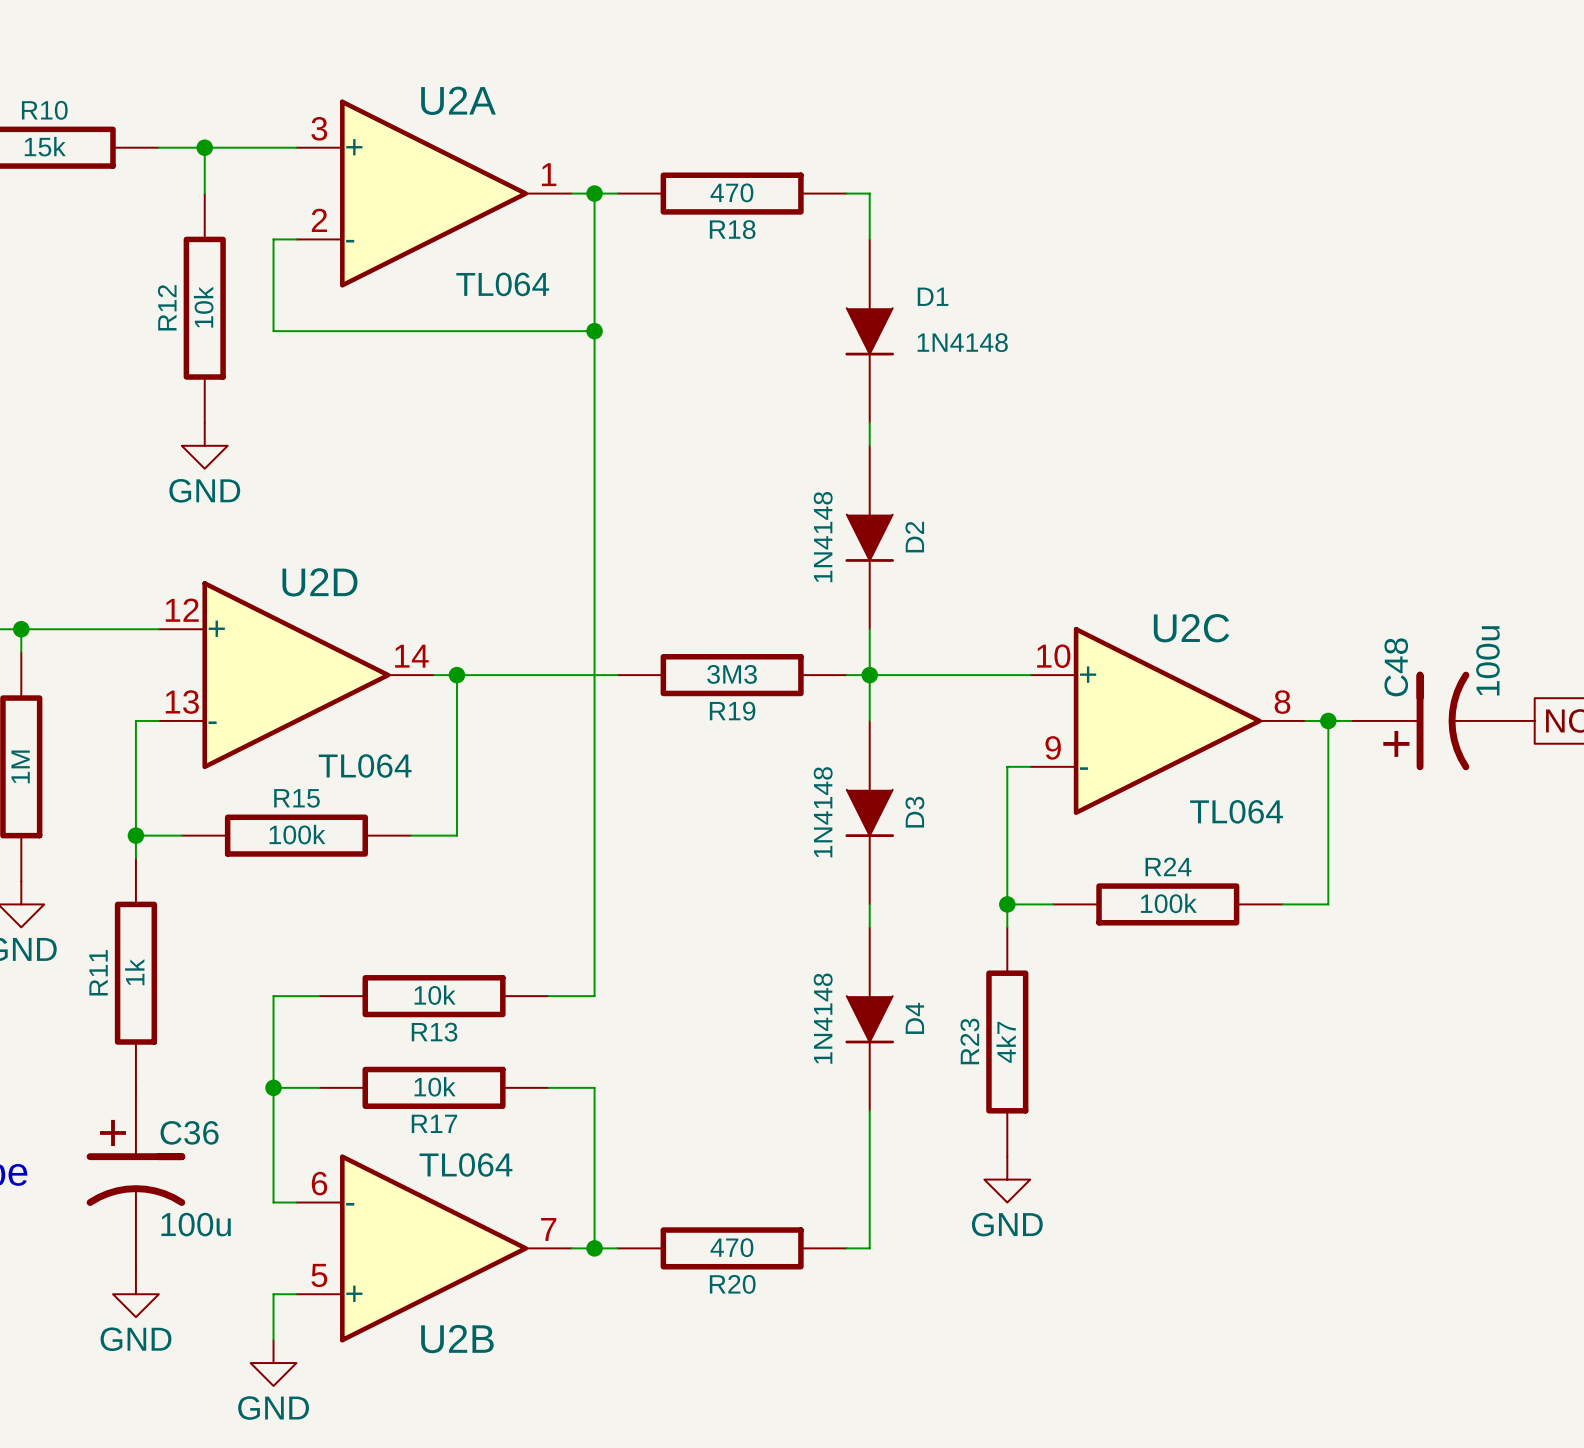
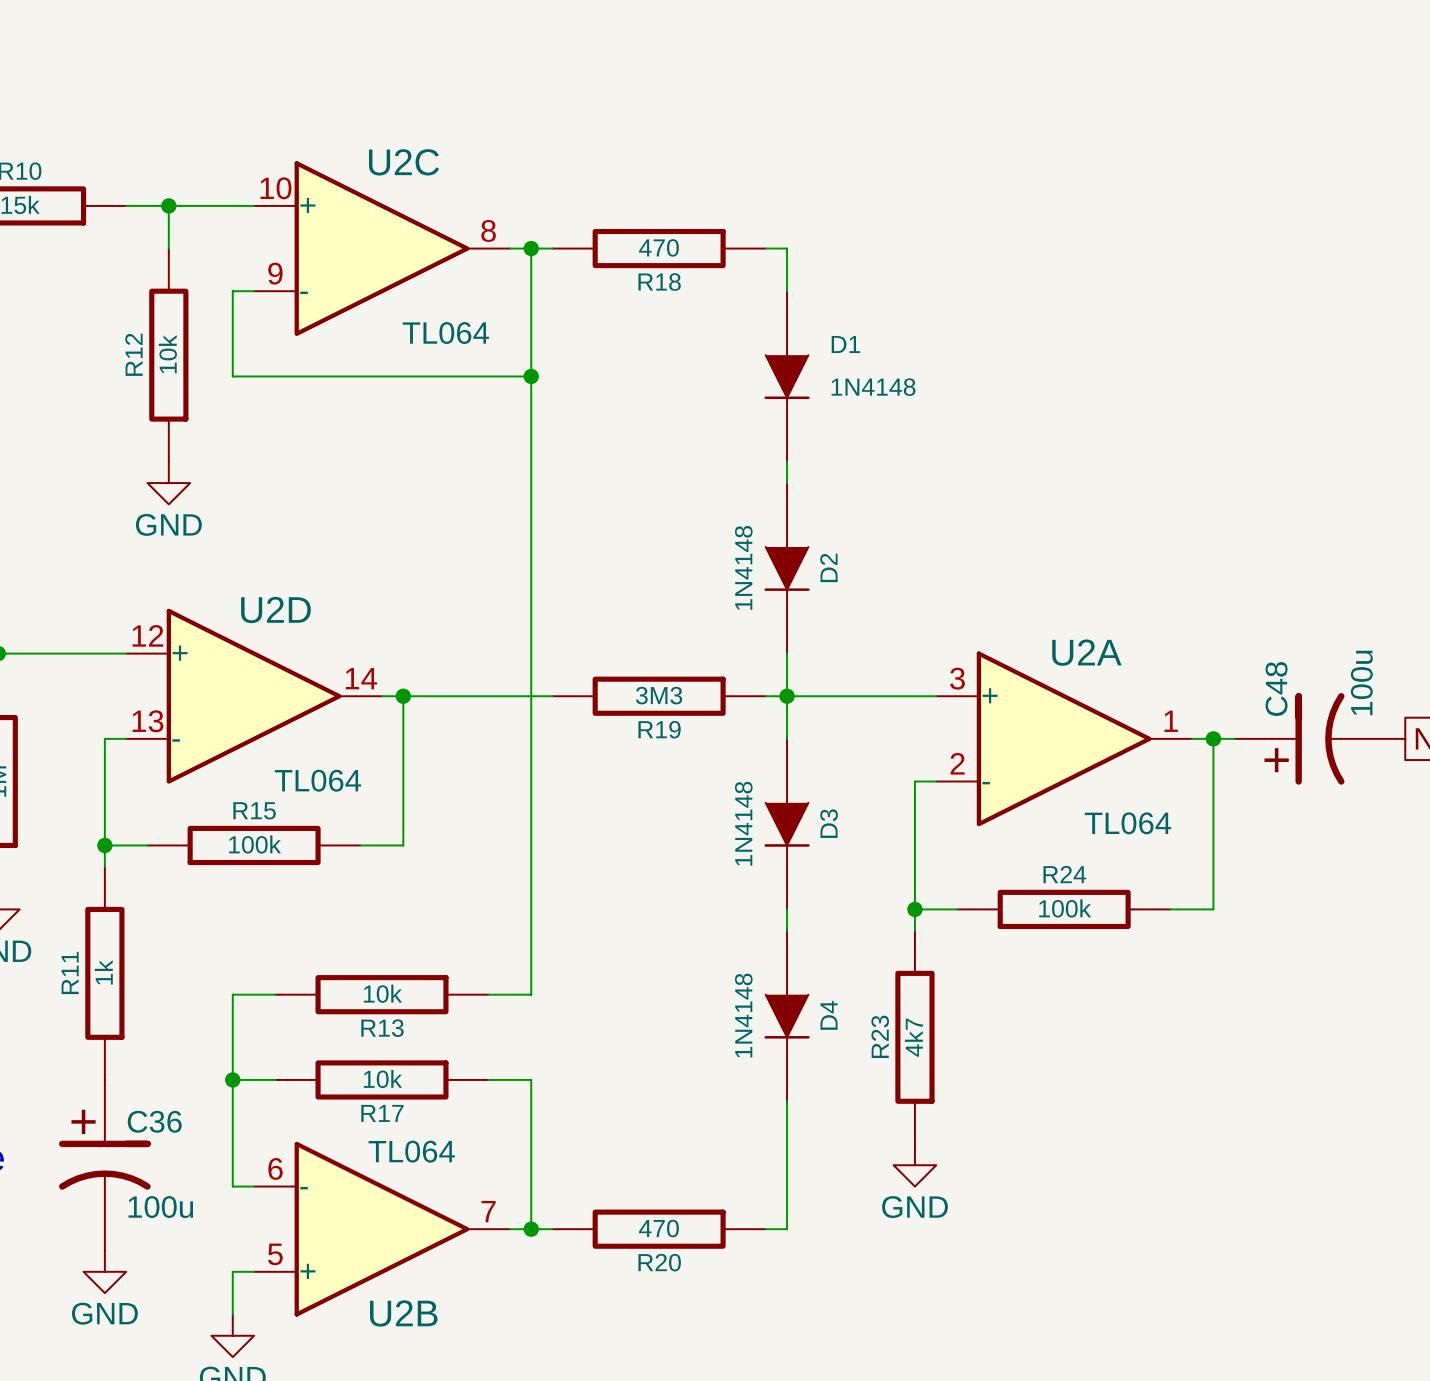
U2A position: (434, 193) -> (1064, 738)
U2C position: (1167, 720) -> (382, 248)

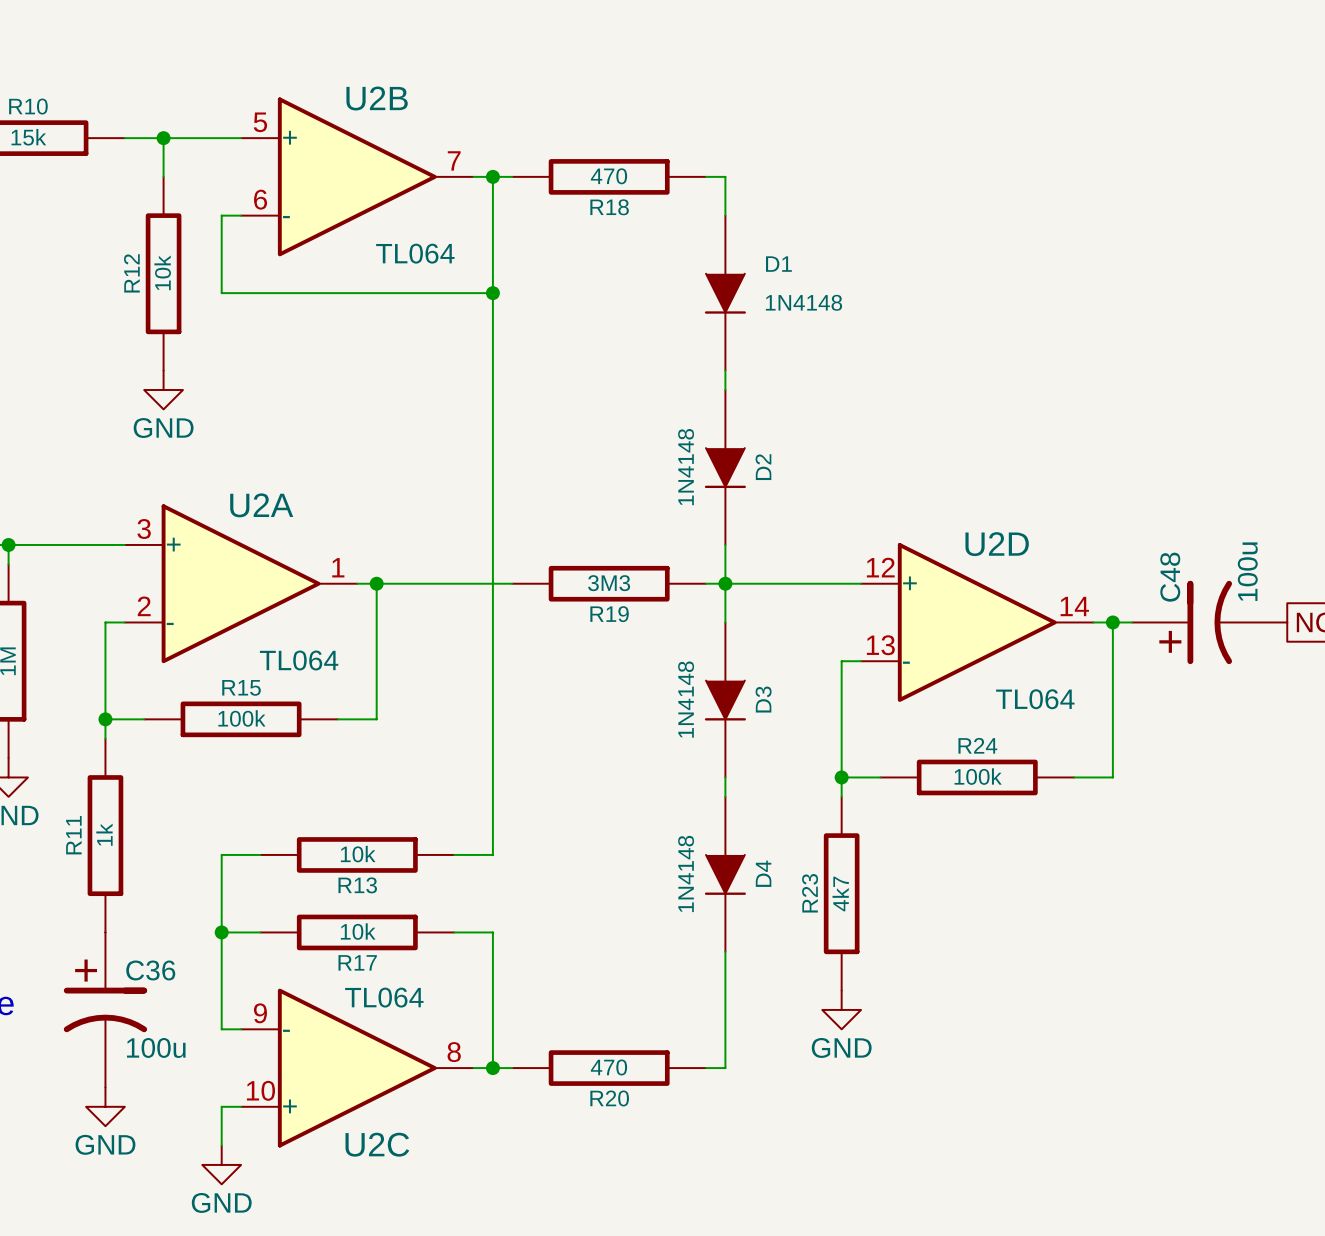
U2C flip: as is (382, 248) -> up-down (357, 1068)
U2C position: (382, 248) -> (357, 1068)
U2D position: (254, 696) -> (977, 622)
U2A position: (1064, 738) -> (241, 583)
U2B flip: as is (382, 1229) -> up-down (357, 176)
U2B position: (382, 1229) -> (357, 176)

